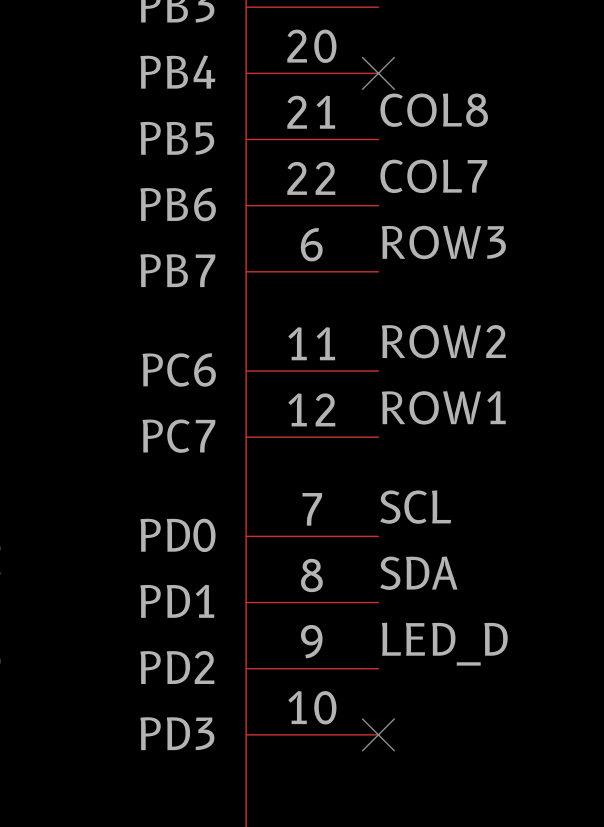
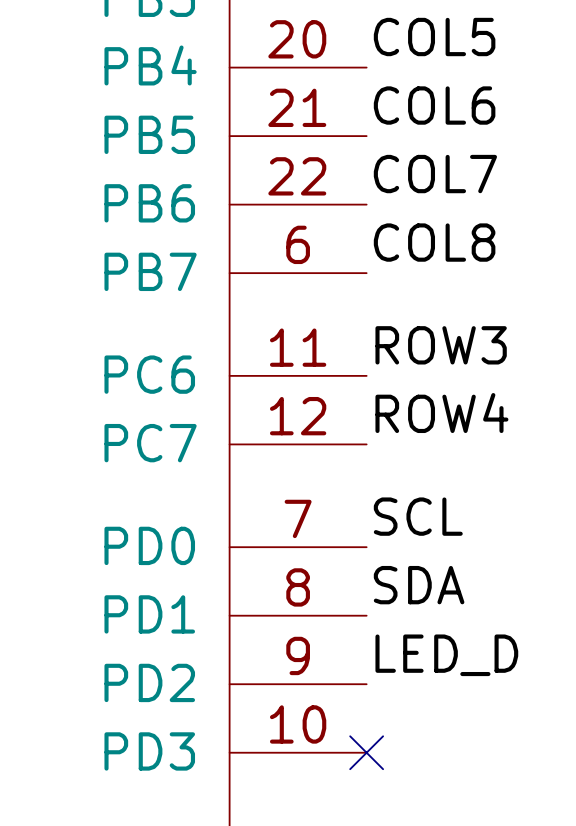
label: none -> COL5 (434, 37)
no-connect mark: (378, 73) -> none
label: COL8 (434, 110) -> COL6 (434, 105)
label: ROW3 (443, 242) -> COL8 (434, 242)
label: ROW2 (443, 341) -> ROW3 (441, 345)
label: ROW1 (443, 407) -> ROW4 (441, 413)

